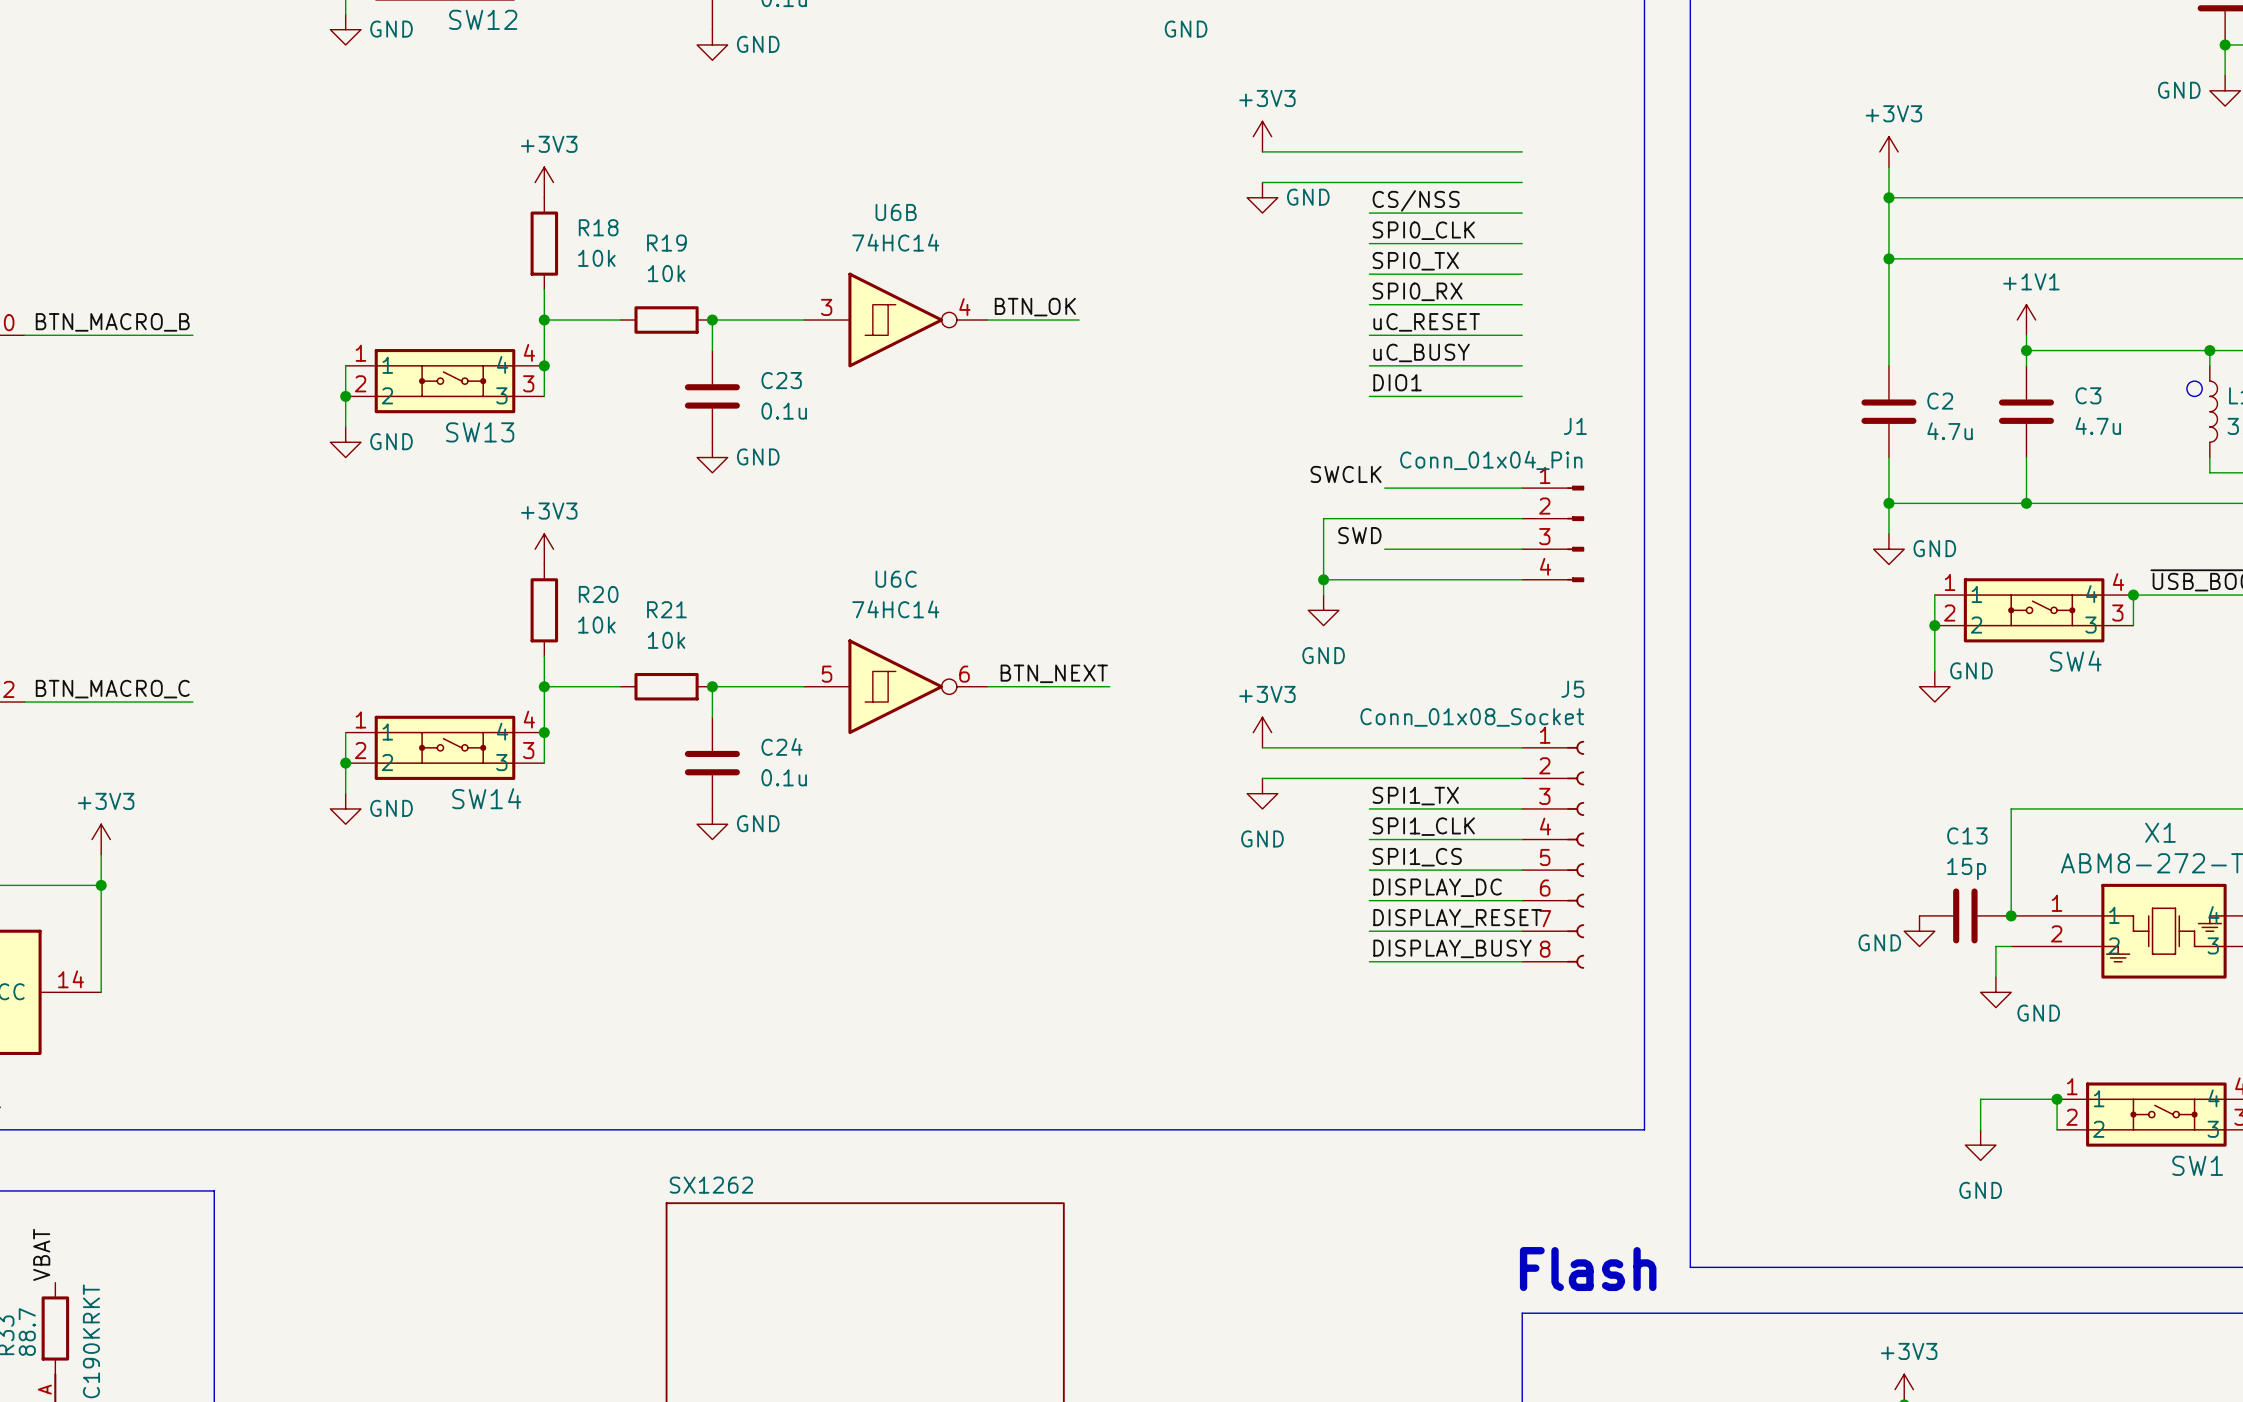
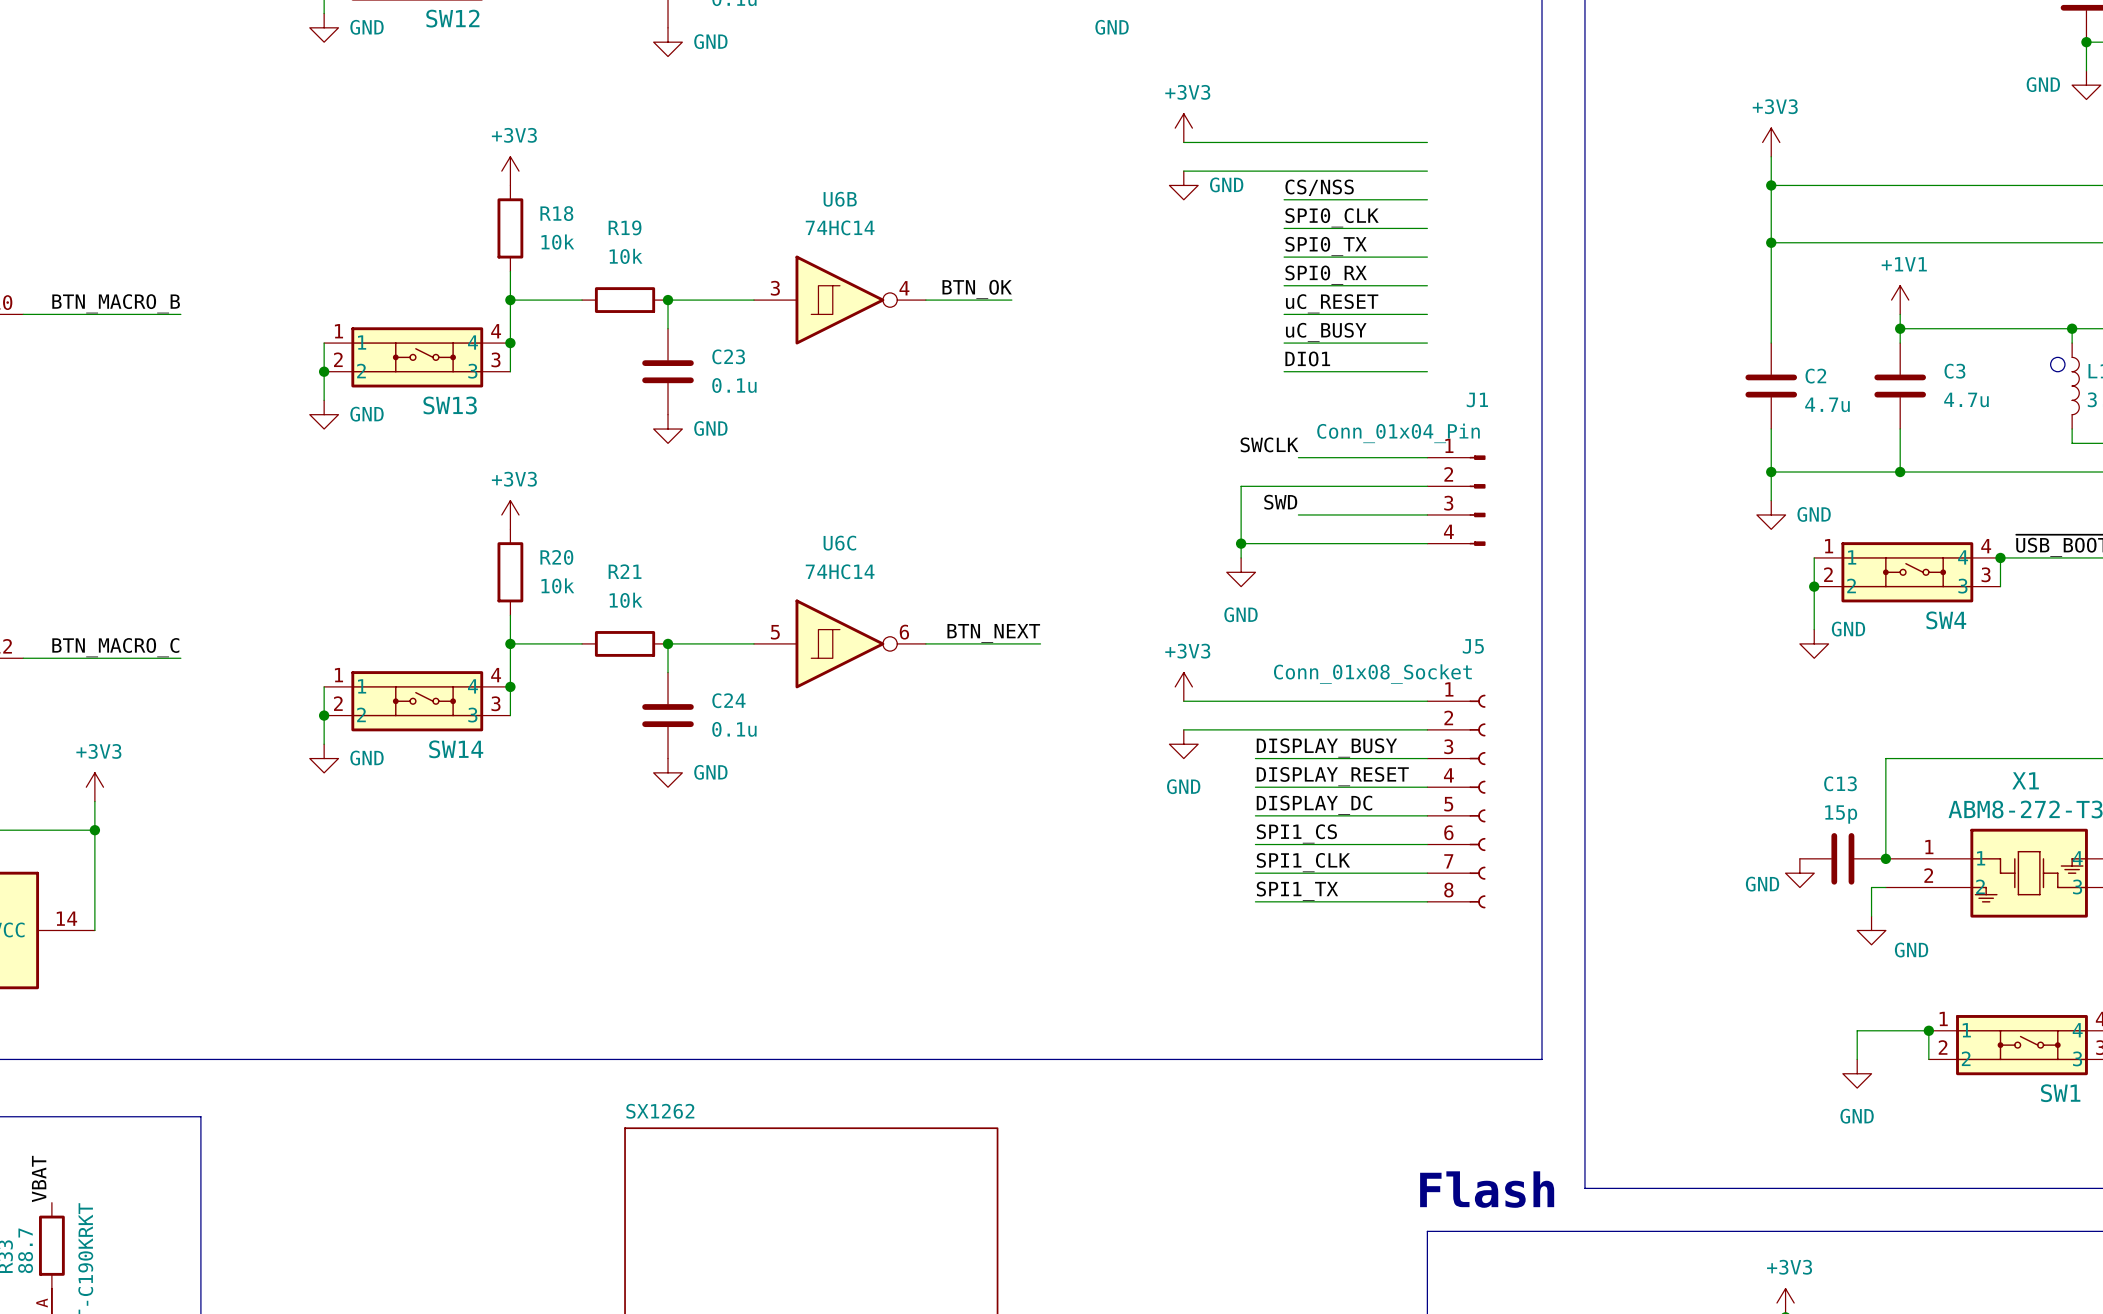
label position: SPI1_TX (1415, 796) -> SPI1_TX (1297, 891)
wire: none -> (1255, 758) (1284, 758)
label position: SPI1_CLK (1423, 826) -> SPI1_CLK (1303, 862)
wire: none -> (1255, 787) (1284, 787)
label position: SPI1_CS (1417, 857) -> SPI1_CS (1296, 833)
wire: none -> (1255, 815) (1284, 815)
label position: DISPLAY_DC (1437, 887) -> DISPLAY_DC (1314, 805)
wire: none -> (1255, 844) (1284, 844)
label position: DISPLAY_RESET (1457, 918) -> DISPLAY_RESET (1332, 776)
wire: none -> (1255, 873) (1284, 873)
label position: DISPLAY_BUSY (1452, 948) -> DISPLAY_BUSY (1326, 747)
wire: none -> (1255, 901) (1284, 901)

